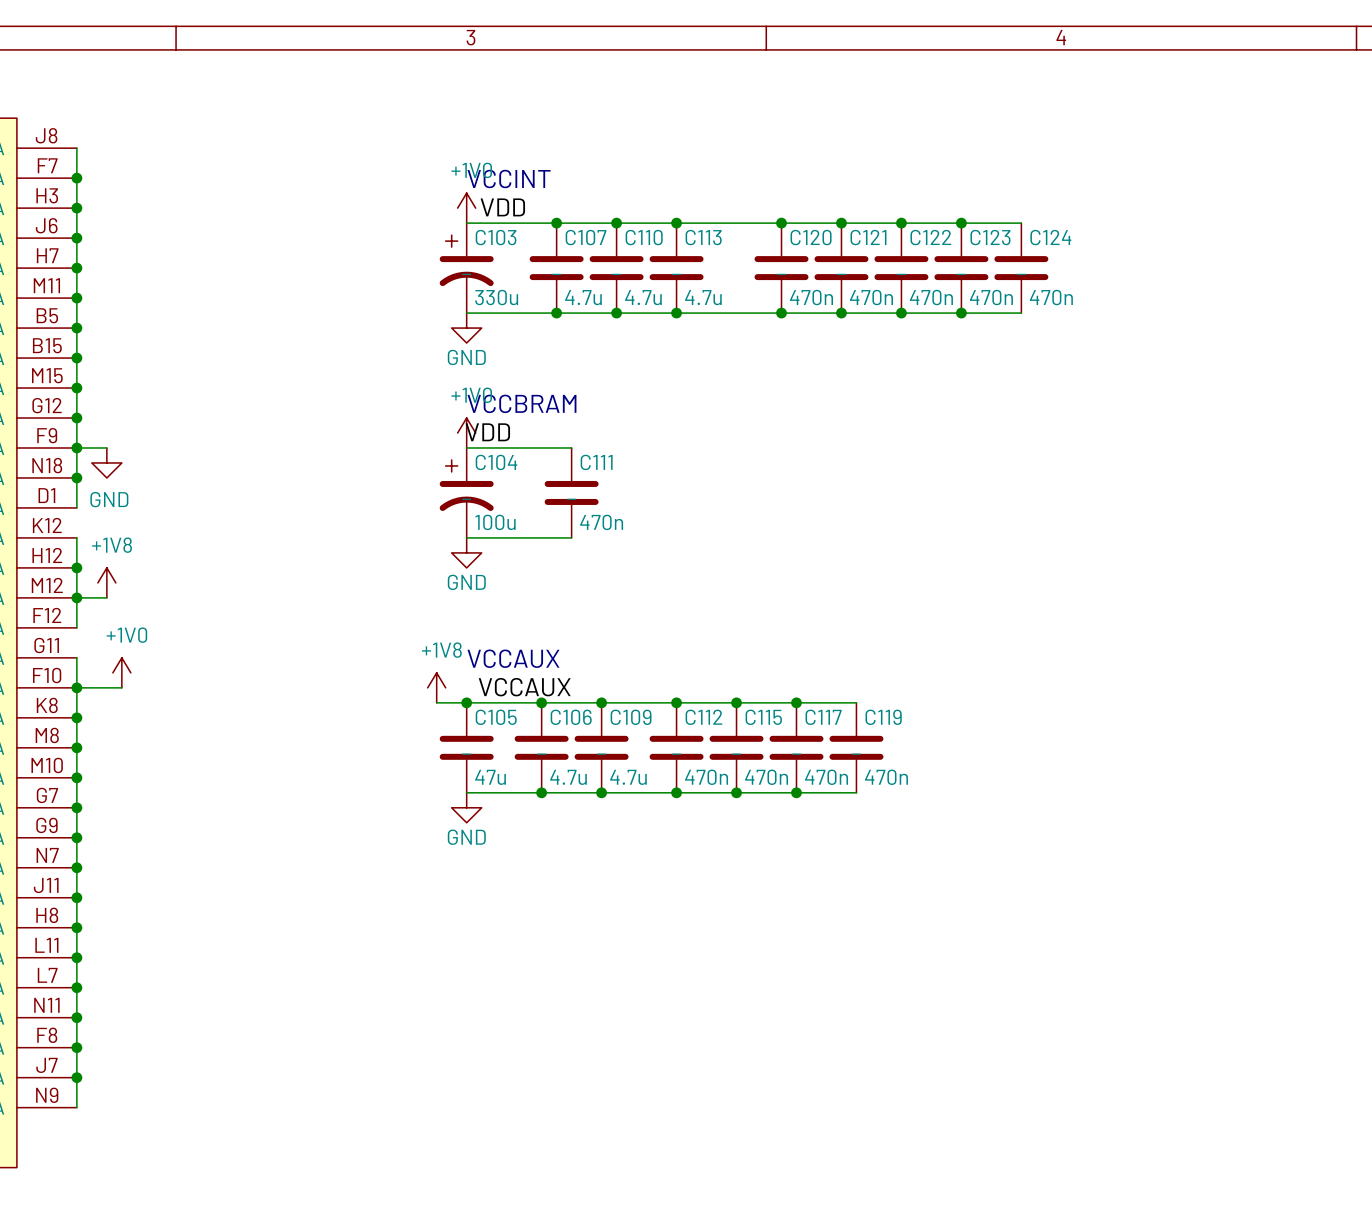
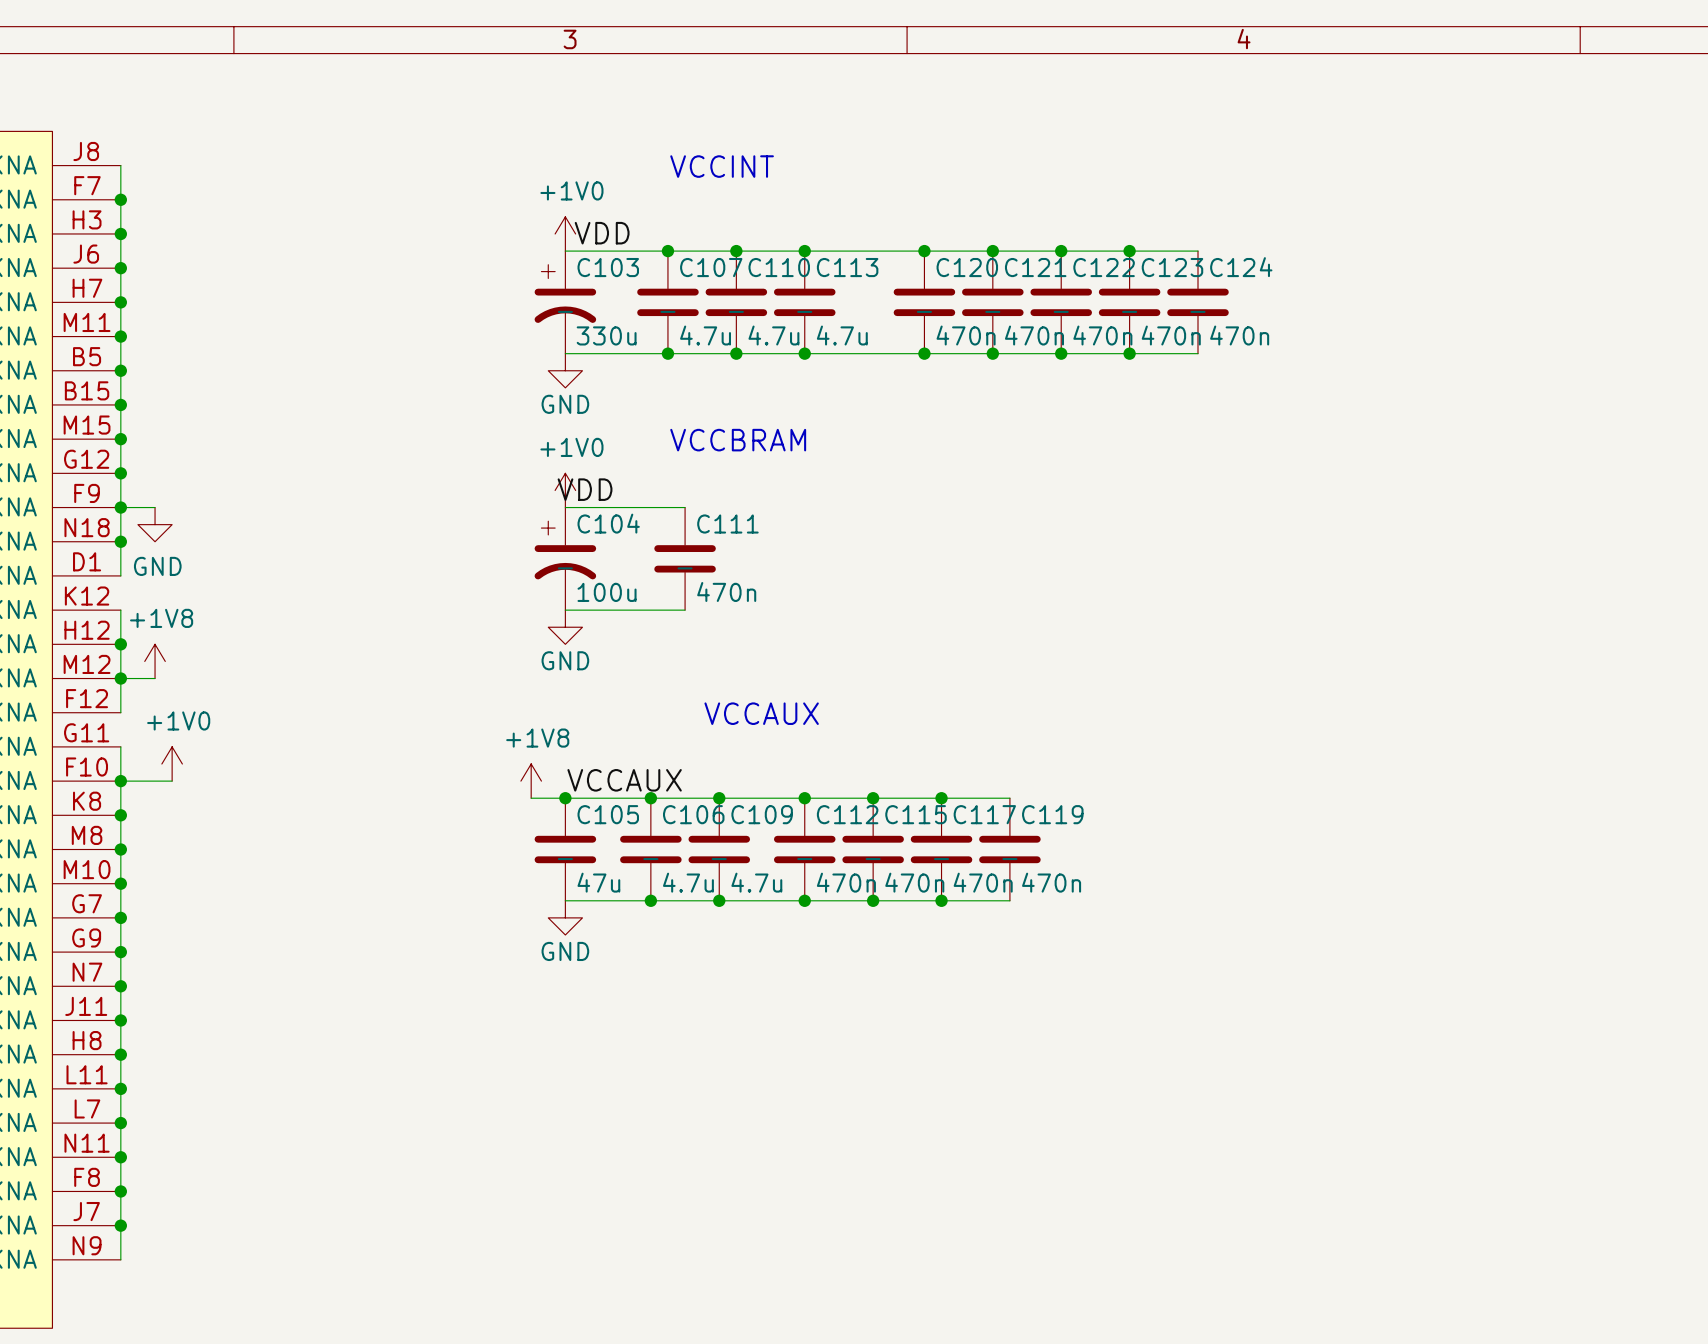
text position: VCCINT (509, 178) -> VCCINT (722, 166)
text position: VCCBRAM (522, 403) -> VCCBRAM (738, 440)
text position: VCCAUX (513, 658) -> VCCAUX (761, 713)

